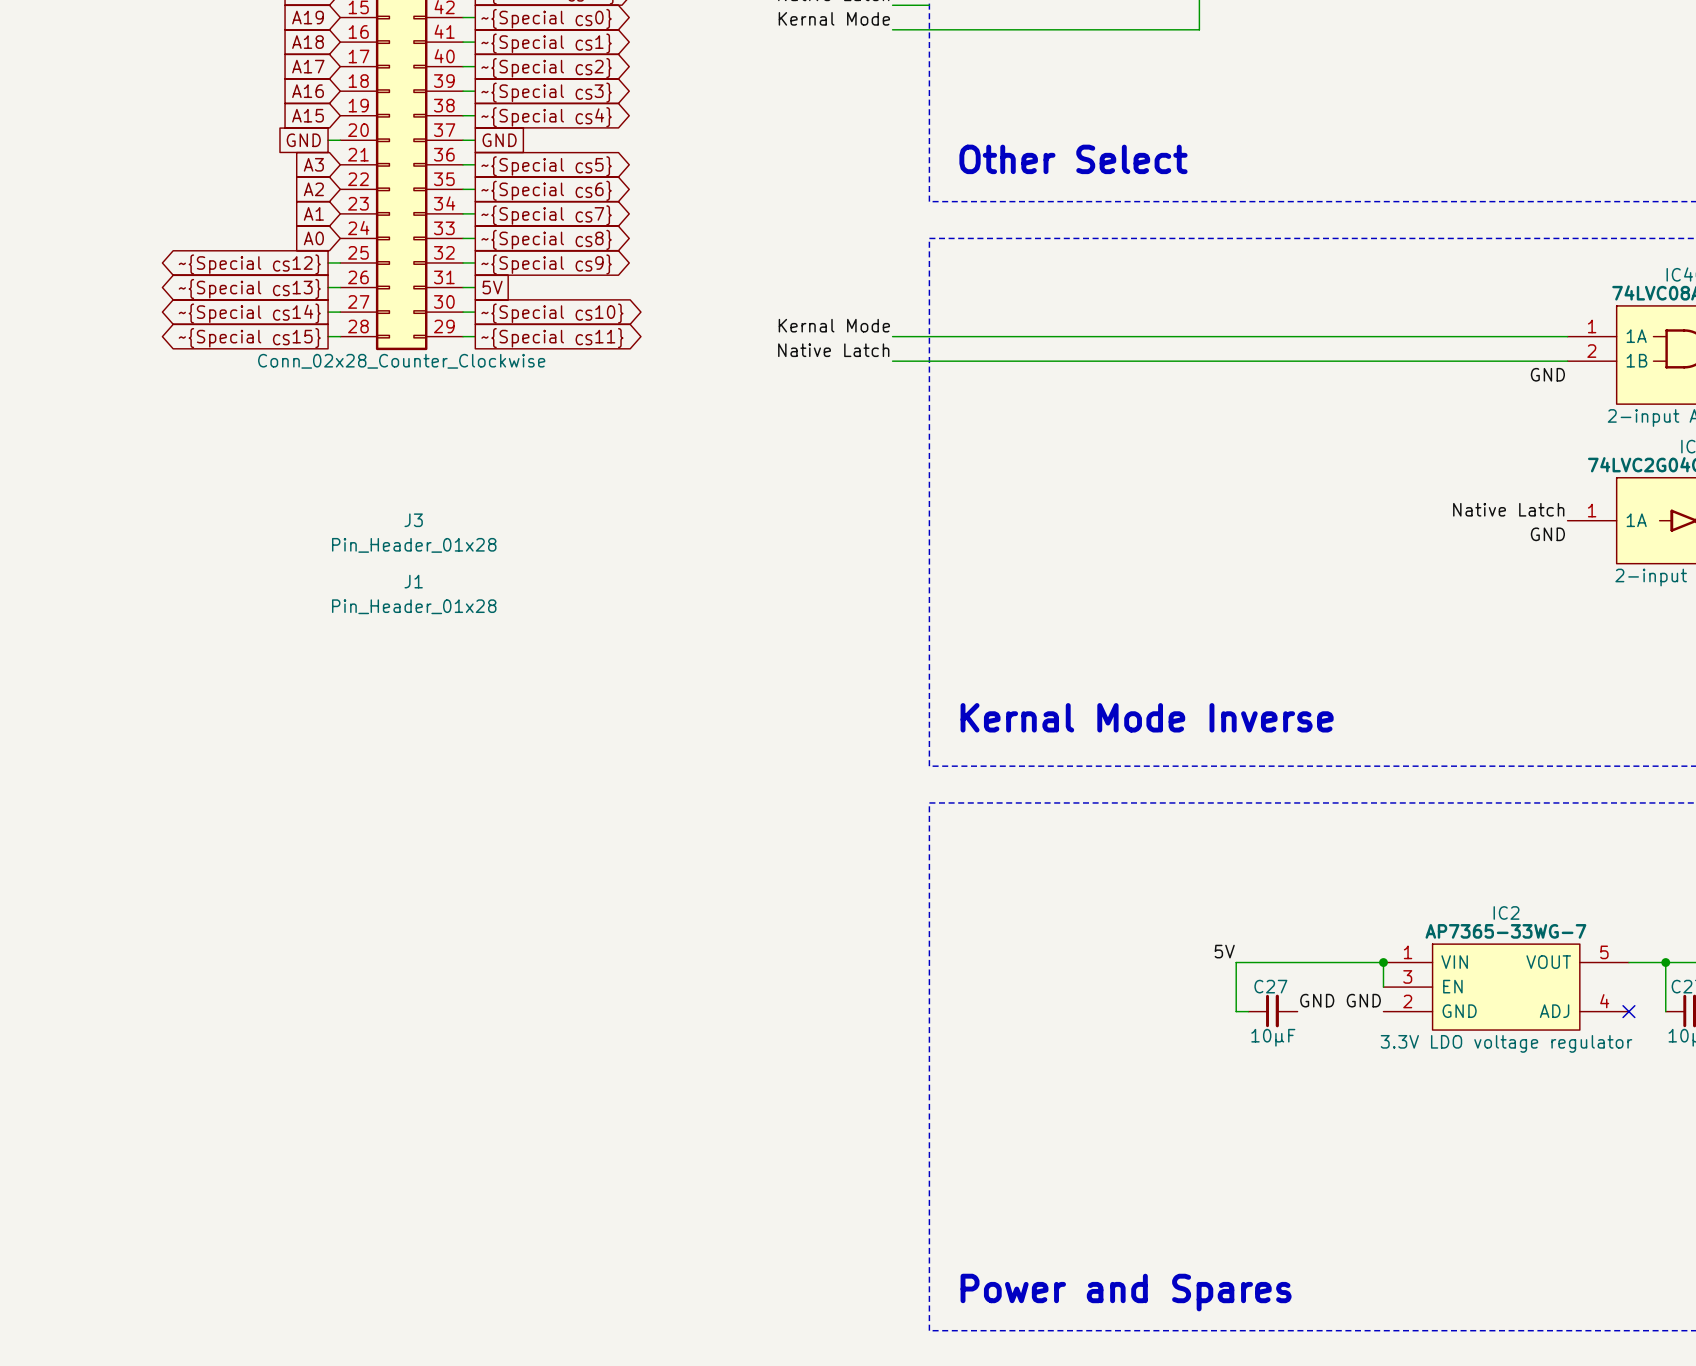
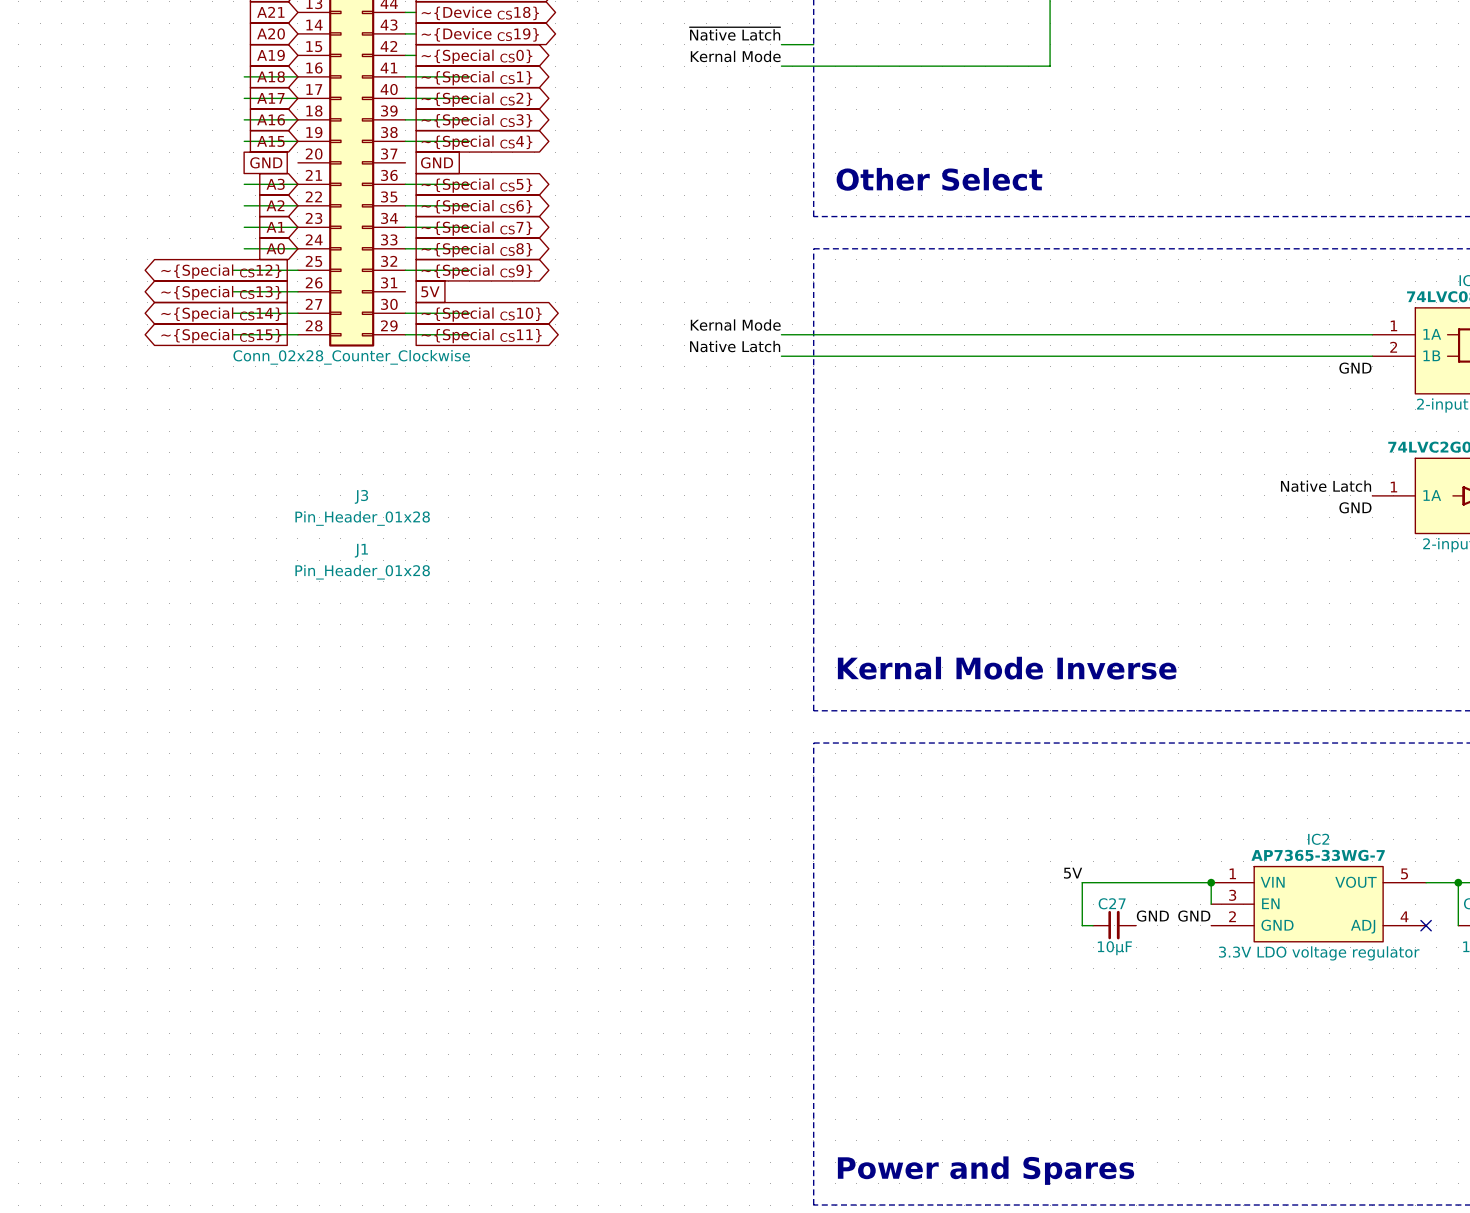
wire: none -> (244, 76) (297, 76)
wire: none -> (416, 76) (469, 76)
wire: none -> (244, 98) (297, 98)
wire: none -> (416, 98) (469, 98)
wire: none -> (244, 119) (297, 119)
wire: none -> (416, 119) (469, 119)
wire: none -> (244, 141) (297, 141)
wire: none -> (416, 141) (469, 141)
wire: (328, 140) (340, 140) -> none
wire: (463, 140) (475, 140) -> none
wire: none -> (244, 184) (297, 184)
wire: none -> (416, 184) (469, 184)
wire: none -> (244, 205) (297, 205)
wire: none -> (416, 205) (469, 205)
wire: none -> (244, 227) (297, 227)
wire: none -> (416, 227) (469, 227)
wire: none -> (244, 248) (297, 248)
wire: none -> (416, 248) (469, 248)
wire: none -> (233, 270) (287, 270)
wire: none -> (416, 270) (469, 270)
wire: none -> (233, 291) (287, 291)
wire: (463, 287) (475, 287) -> none
wire: none -> (233, 313) (287, 313)
wire: none -> (416, 313) (469, 313)
wire: none -> (233, 334) (287, 334)
wire: none -> (416, 334) (469, 334)

